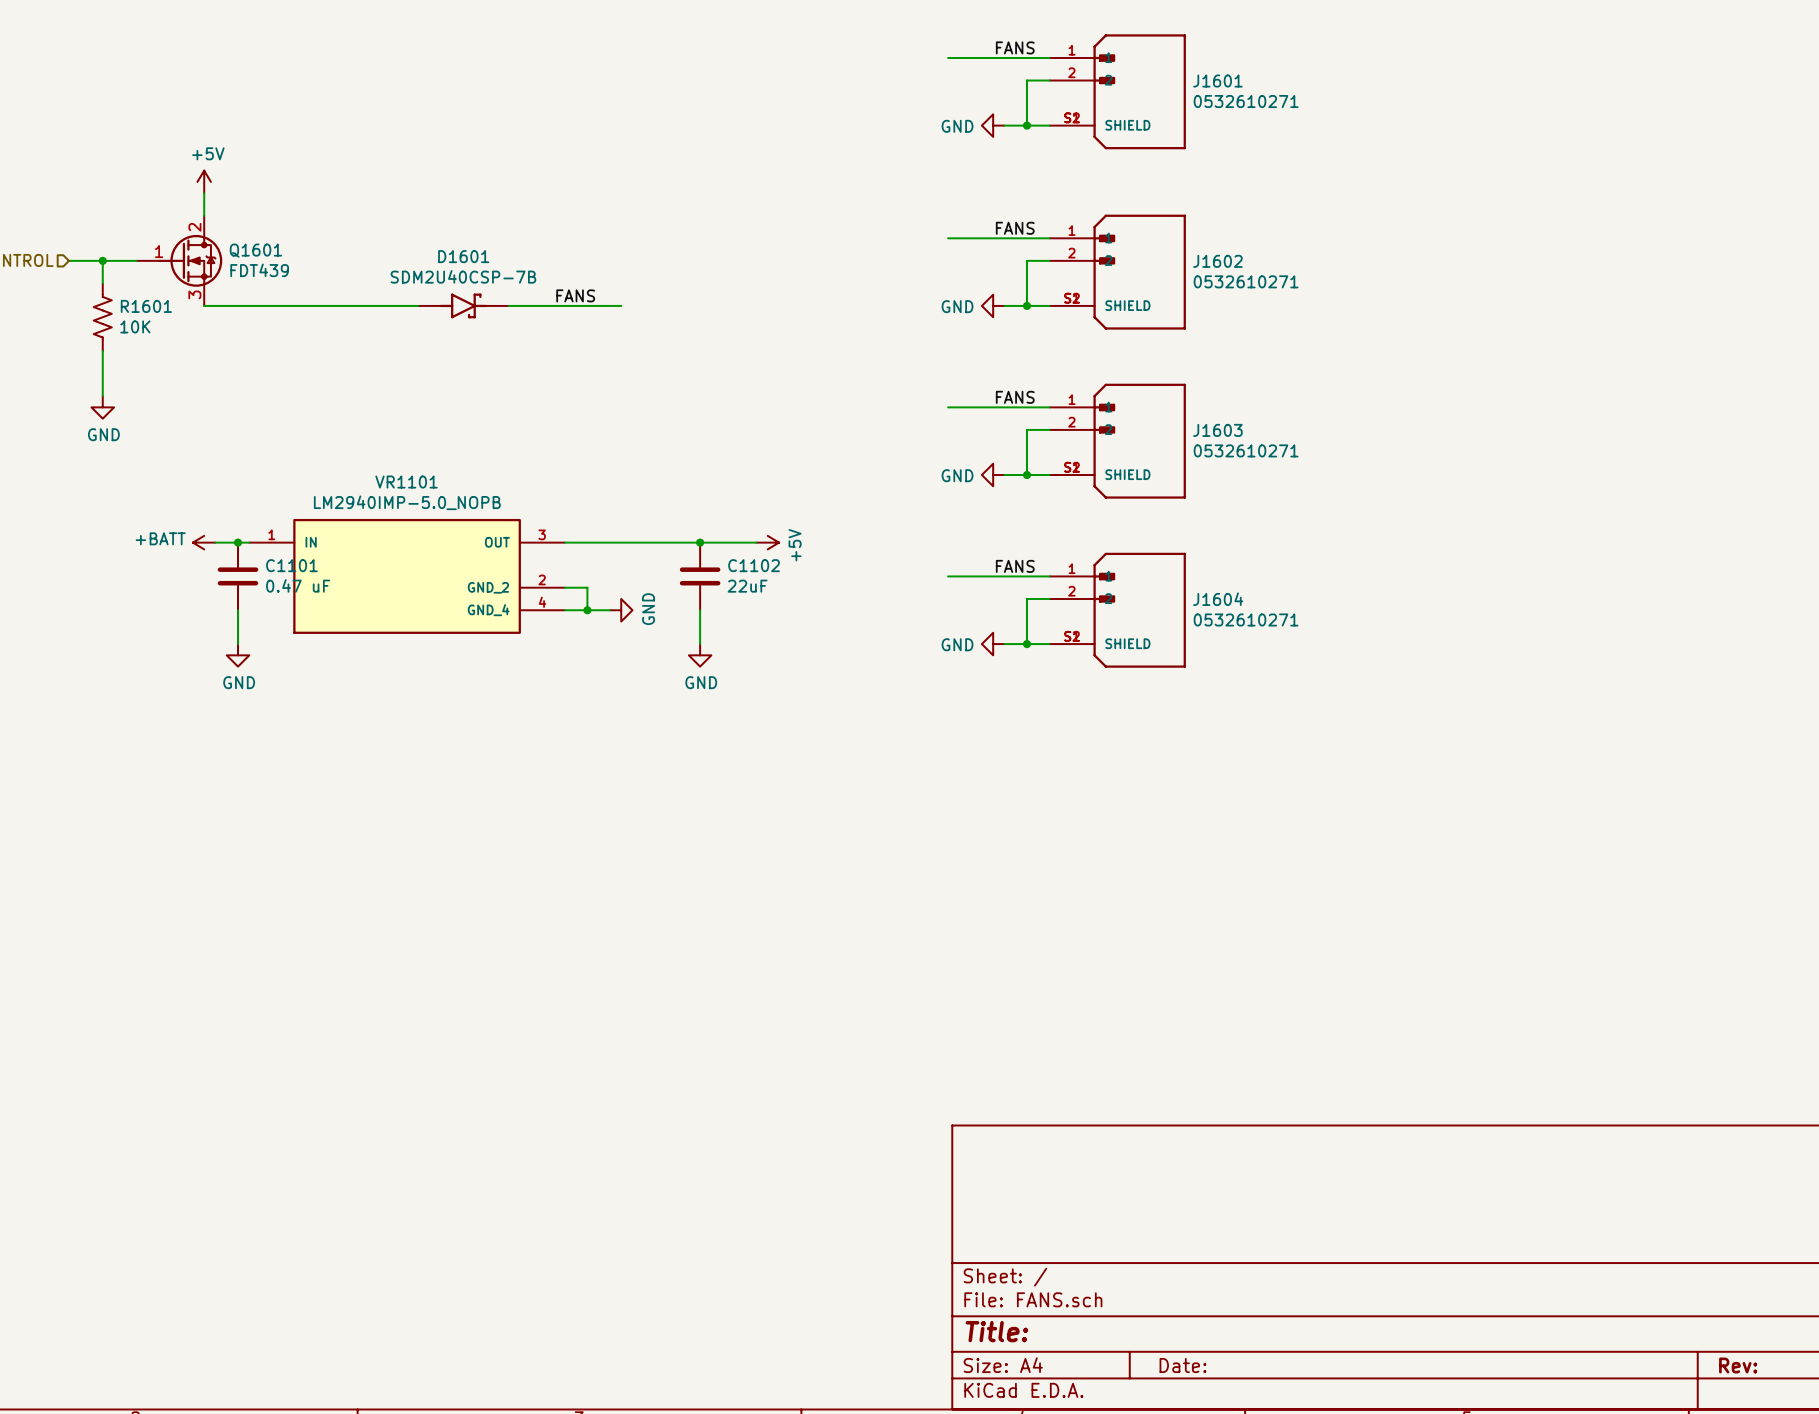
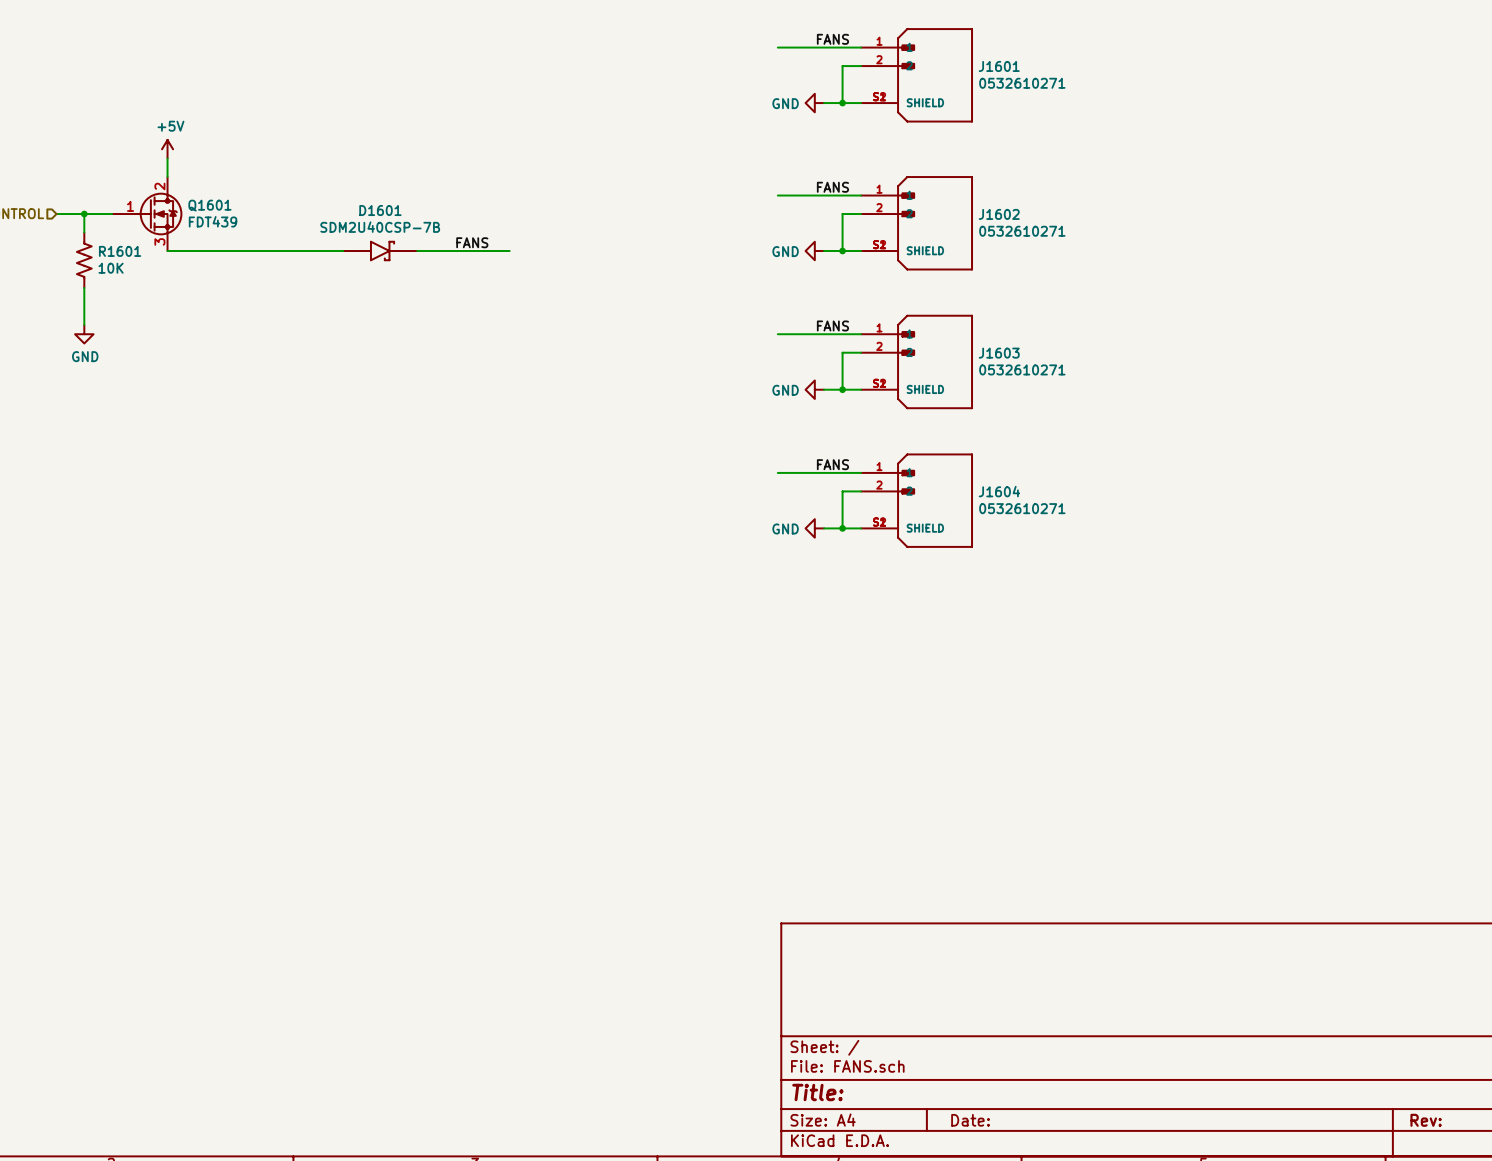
power symbol: +BATT (204, 542) -> none
wire: (215, 542) (249, 542) -> none
junction: (238, 542) -> none
wire: (564, 542) (756, 542) -> none
junction: (700, 542) -> none
power symbol: +5V (767, 542) -> none
C1101: 0.47 uF (238, 576) -> none
VR1101: LM2940IMP-5.0_NOPB (407, 576) -> none
C1102: 22uF (700, 576) -> none
wire: (564, 587) (587, 587) (587, 610) -> none
wire: (238, 610) (238, 644) -> none
wire: (564, 610) (609, 610) -> none
junction: (587, 610) -> none
power symbol: GND (621, 610) -> none
wire: (700, 610) (700, 644) -> none
power symbol: GND (238, 655) -> none
power symbol: GND (700, 655) -> none

